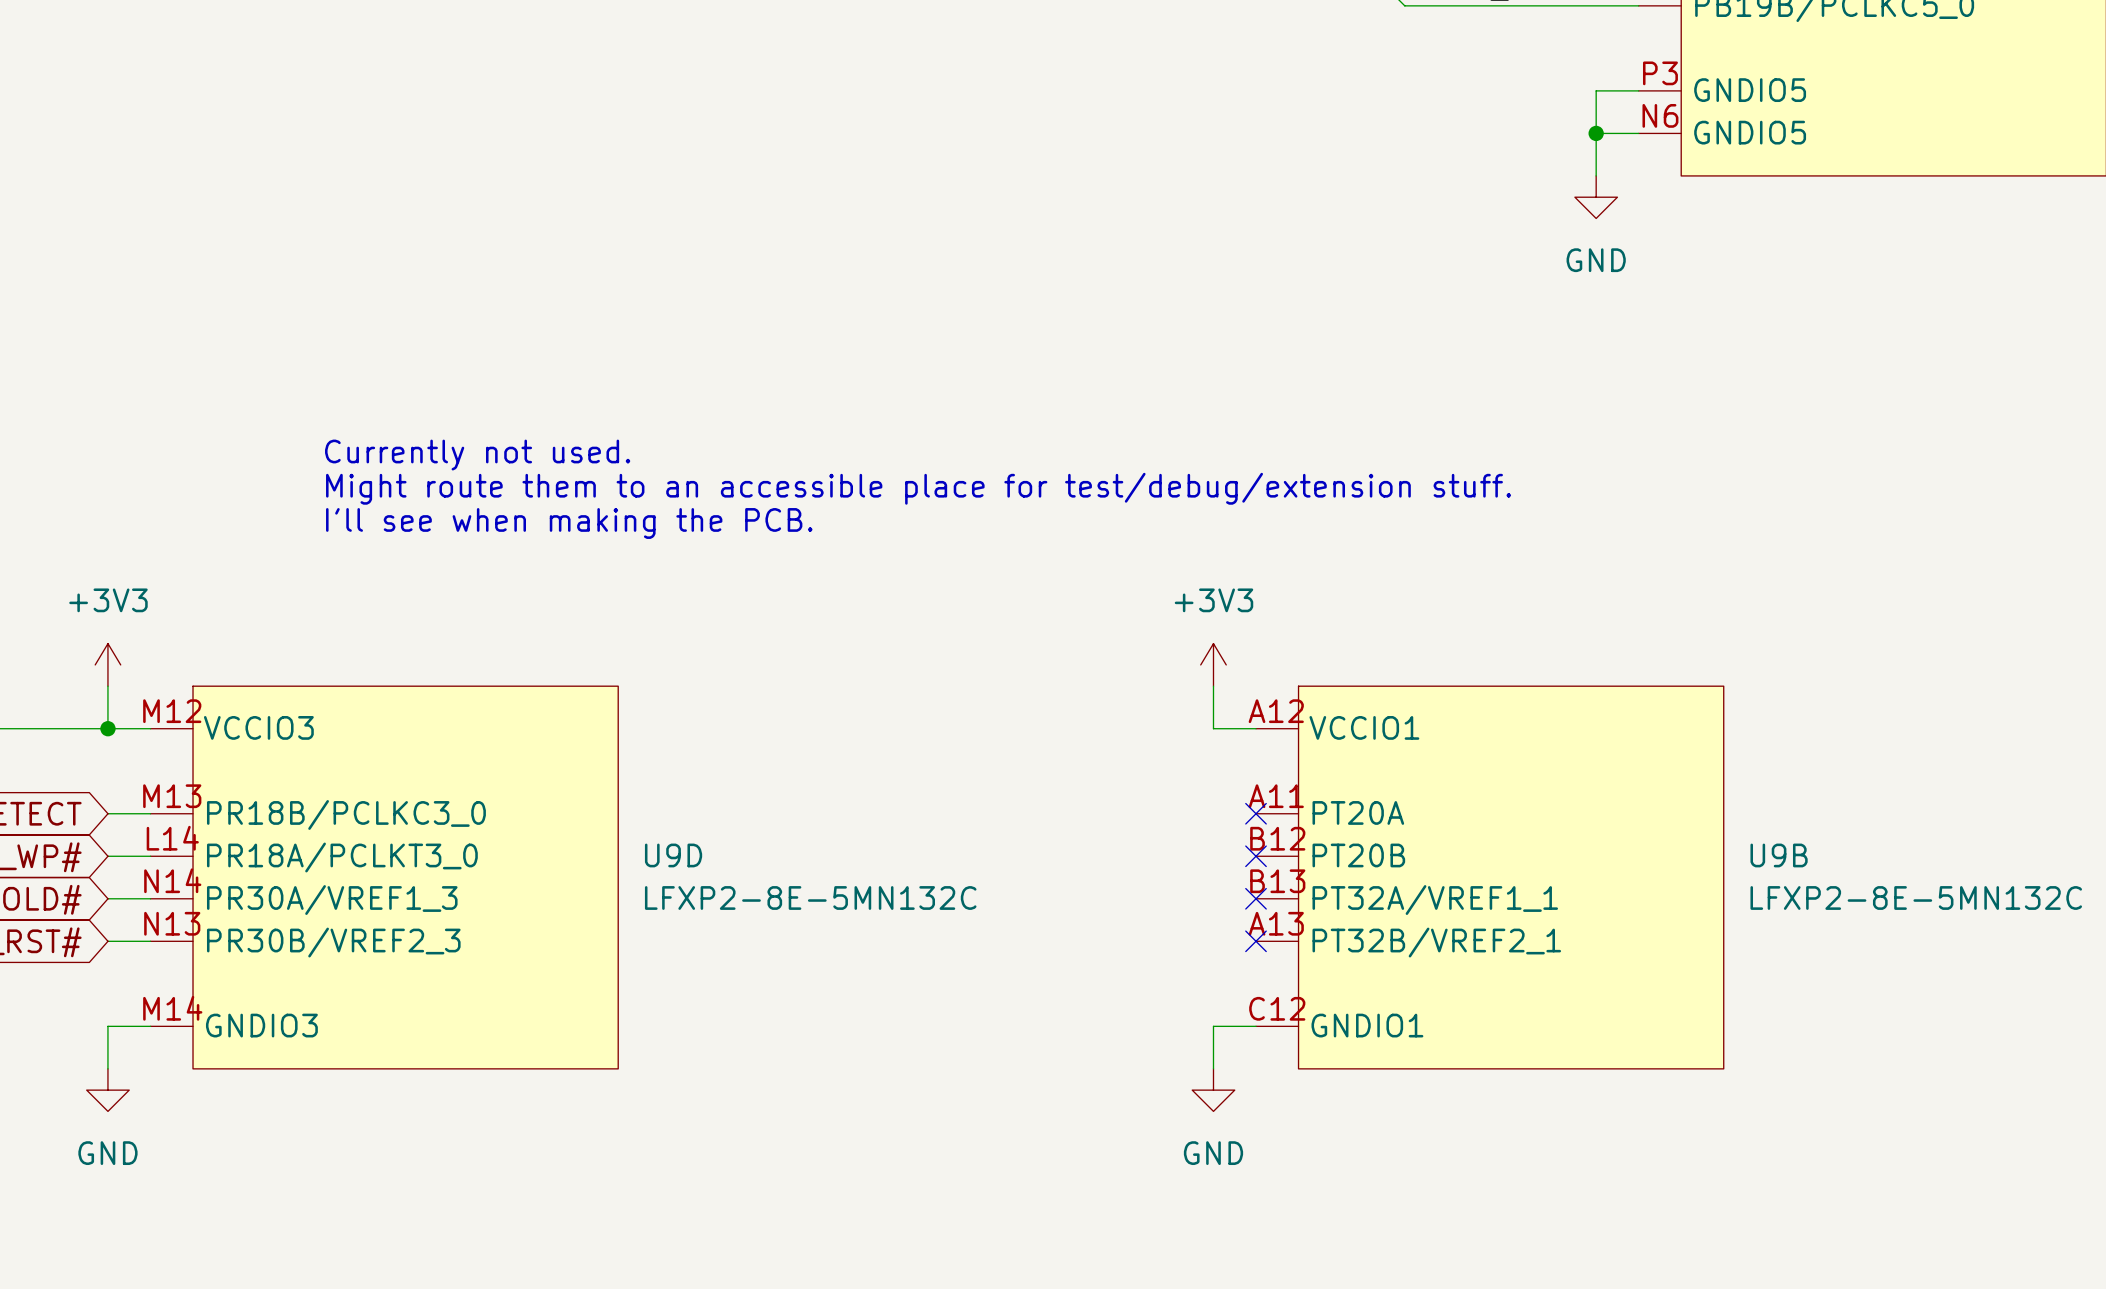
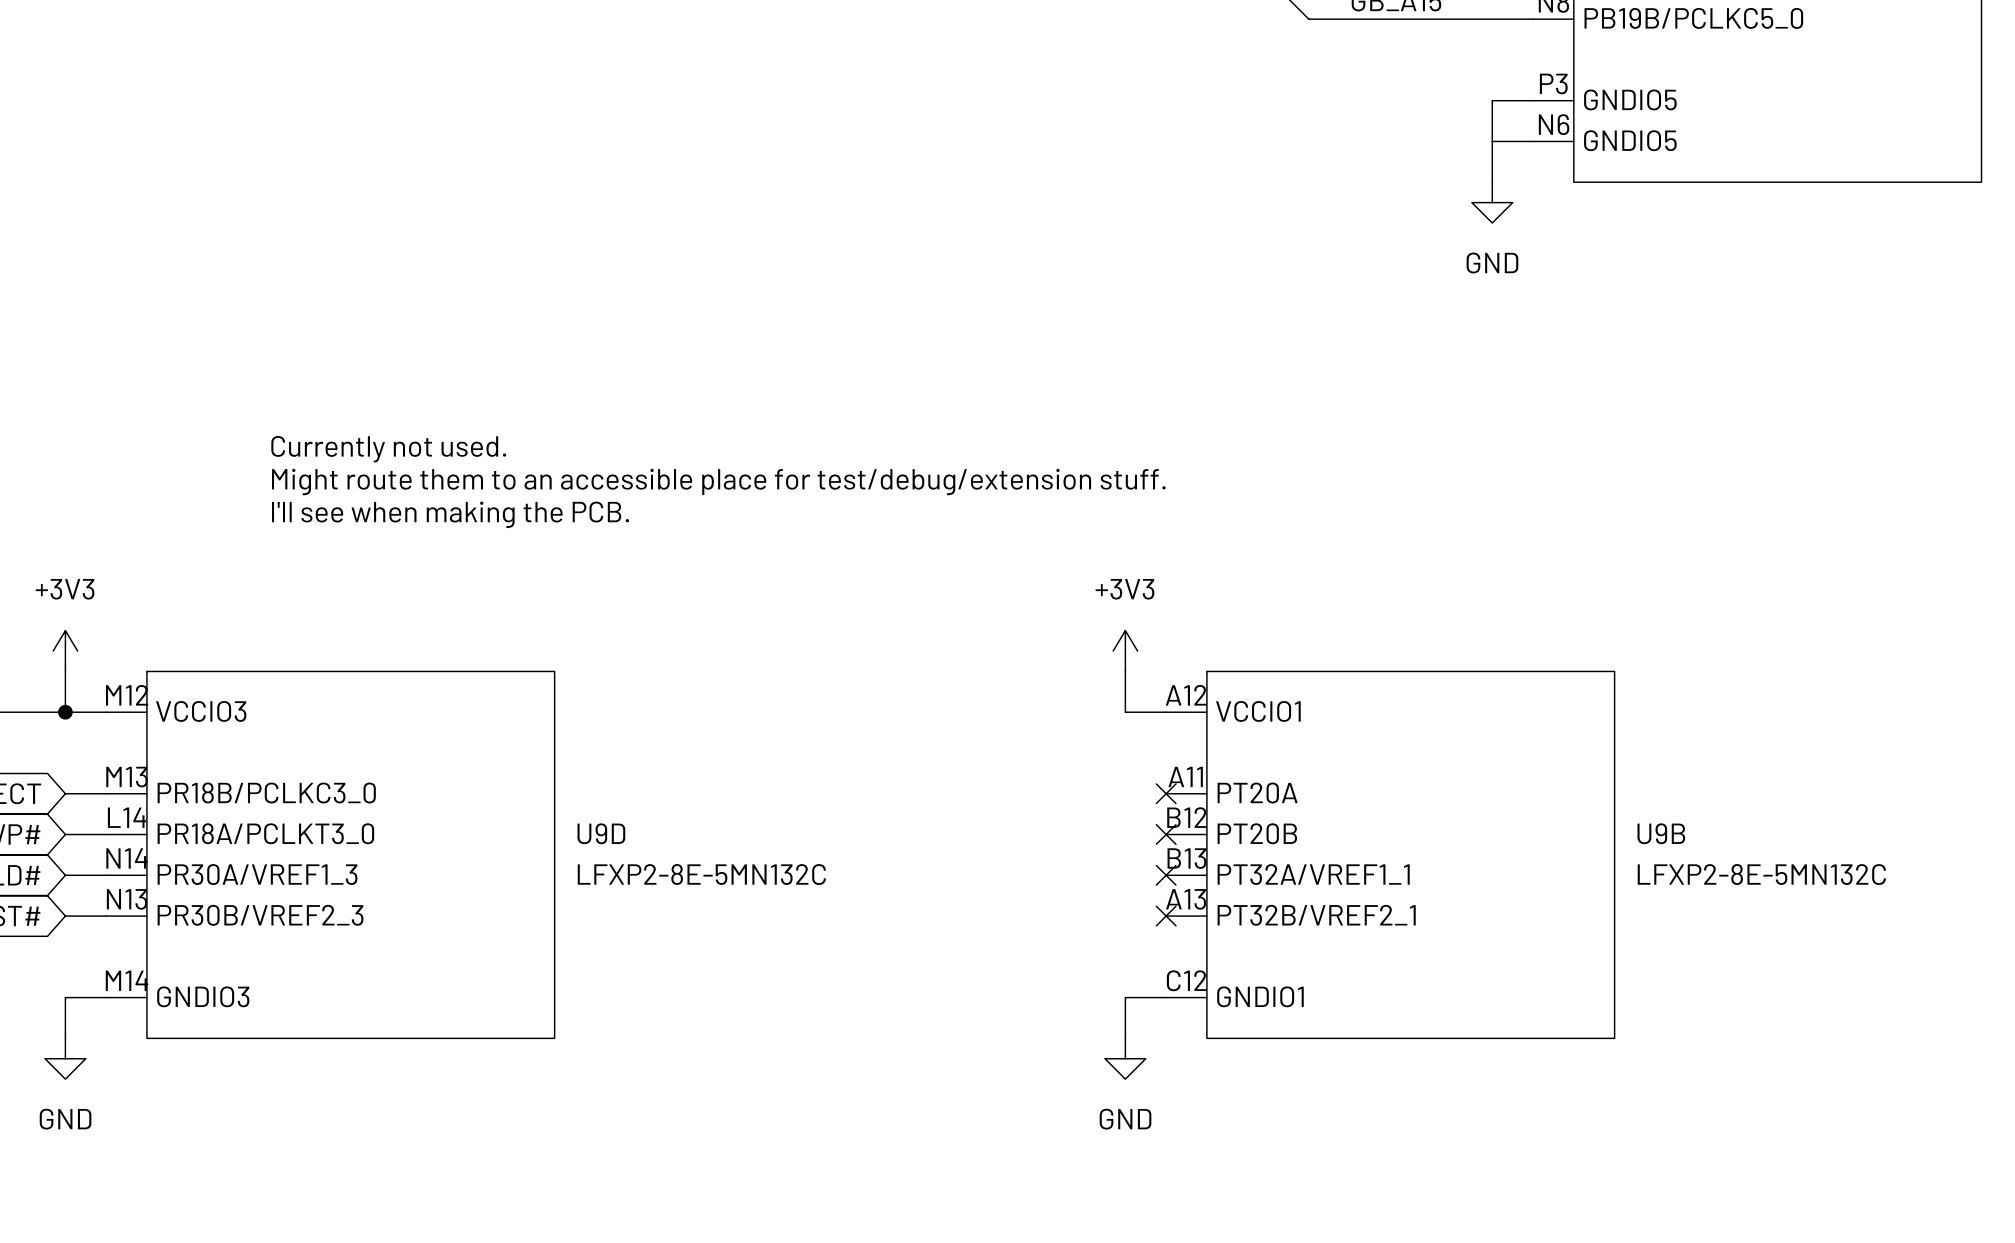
junction: (1596, 133) -> none

